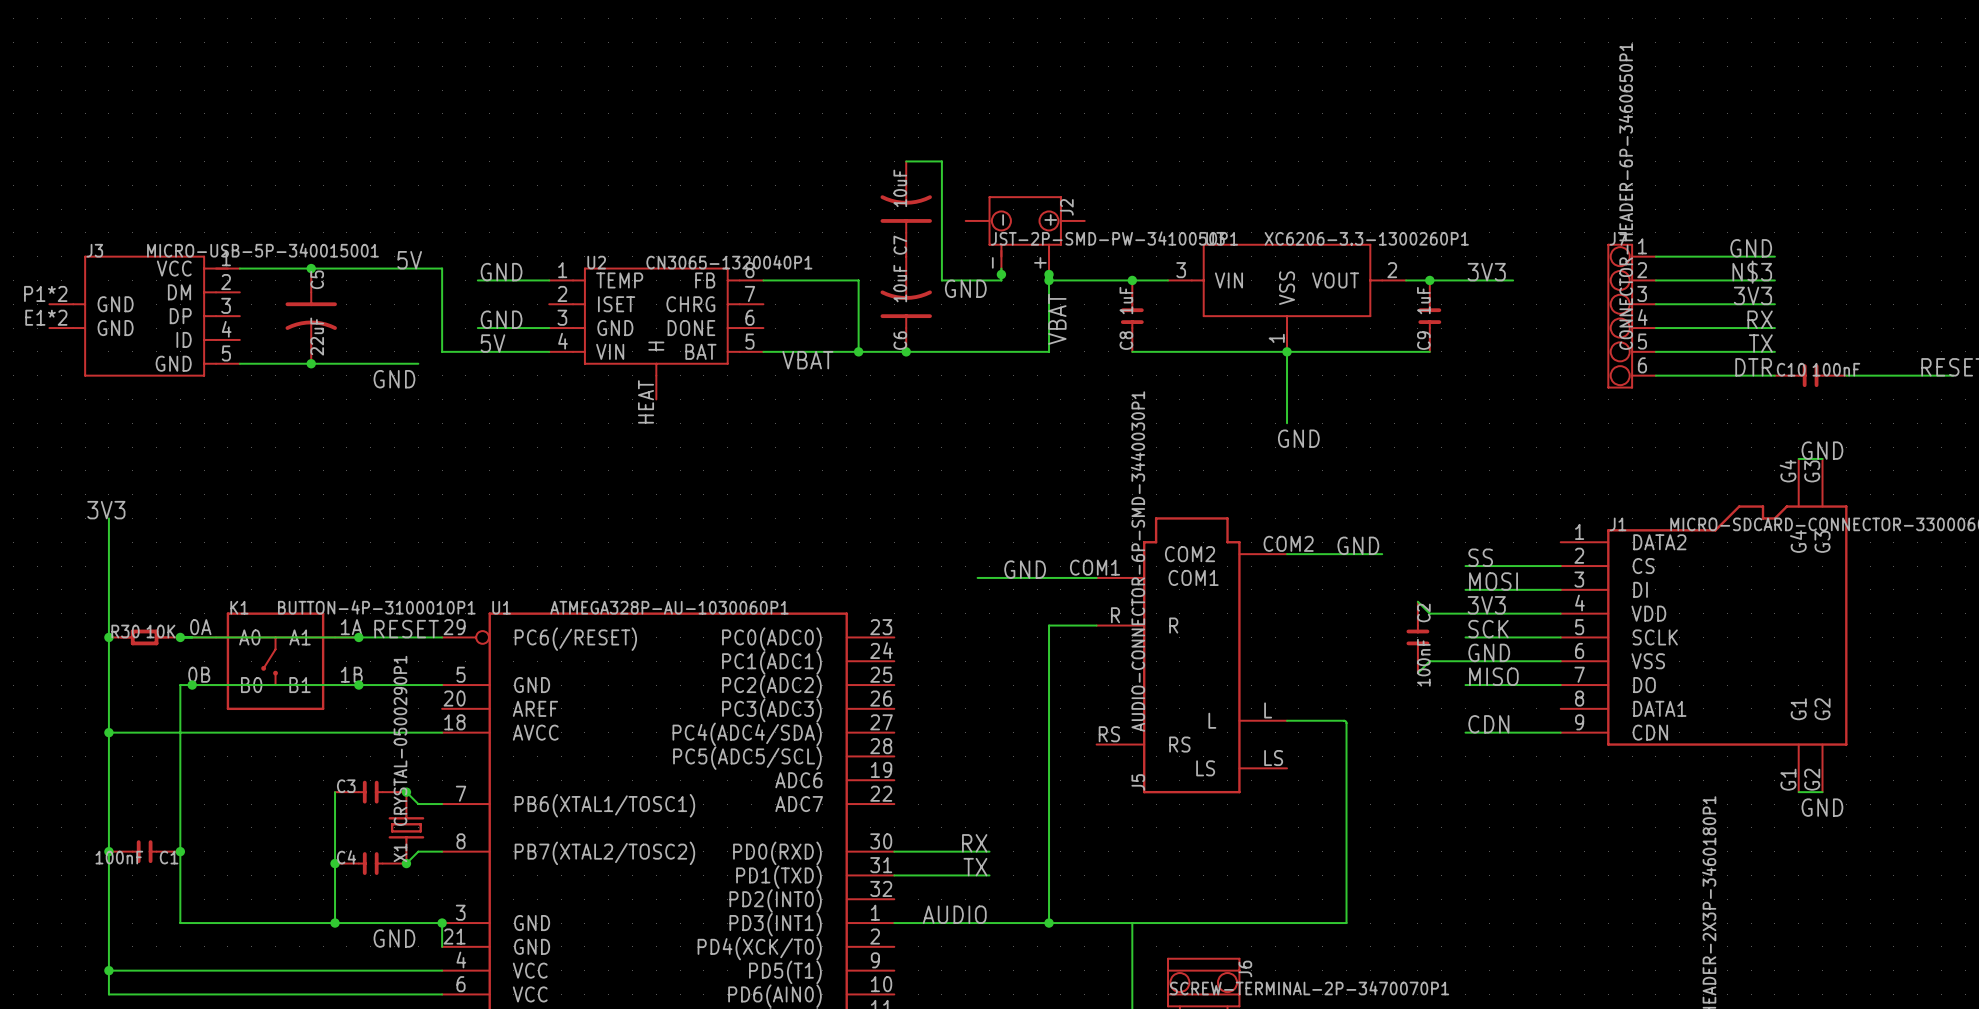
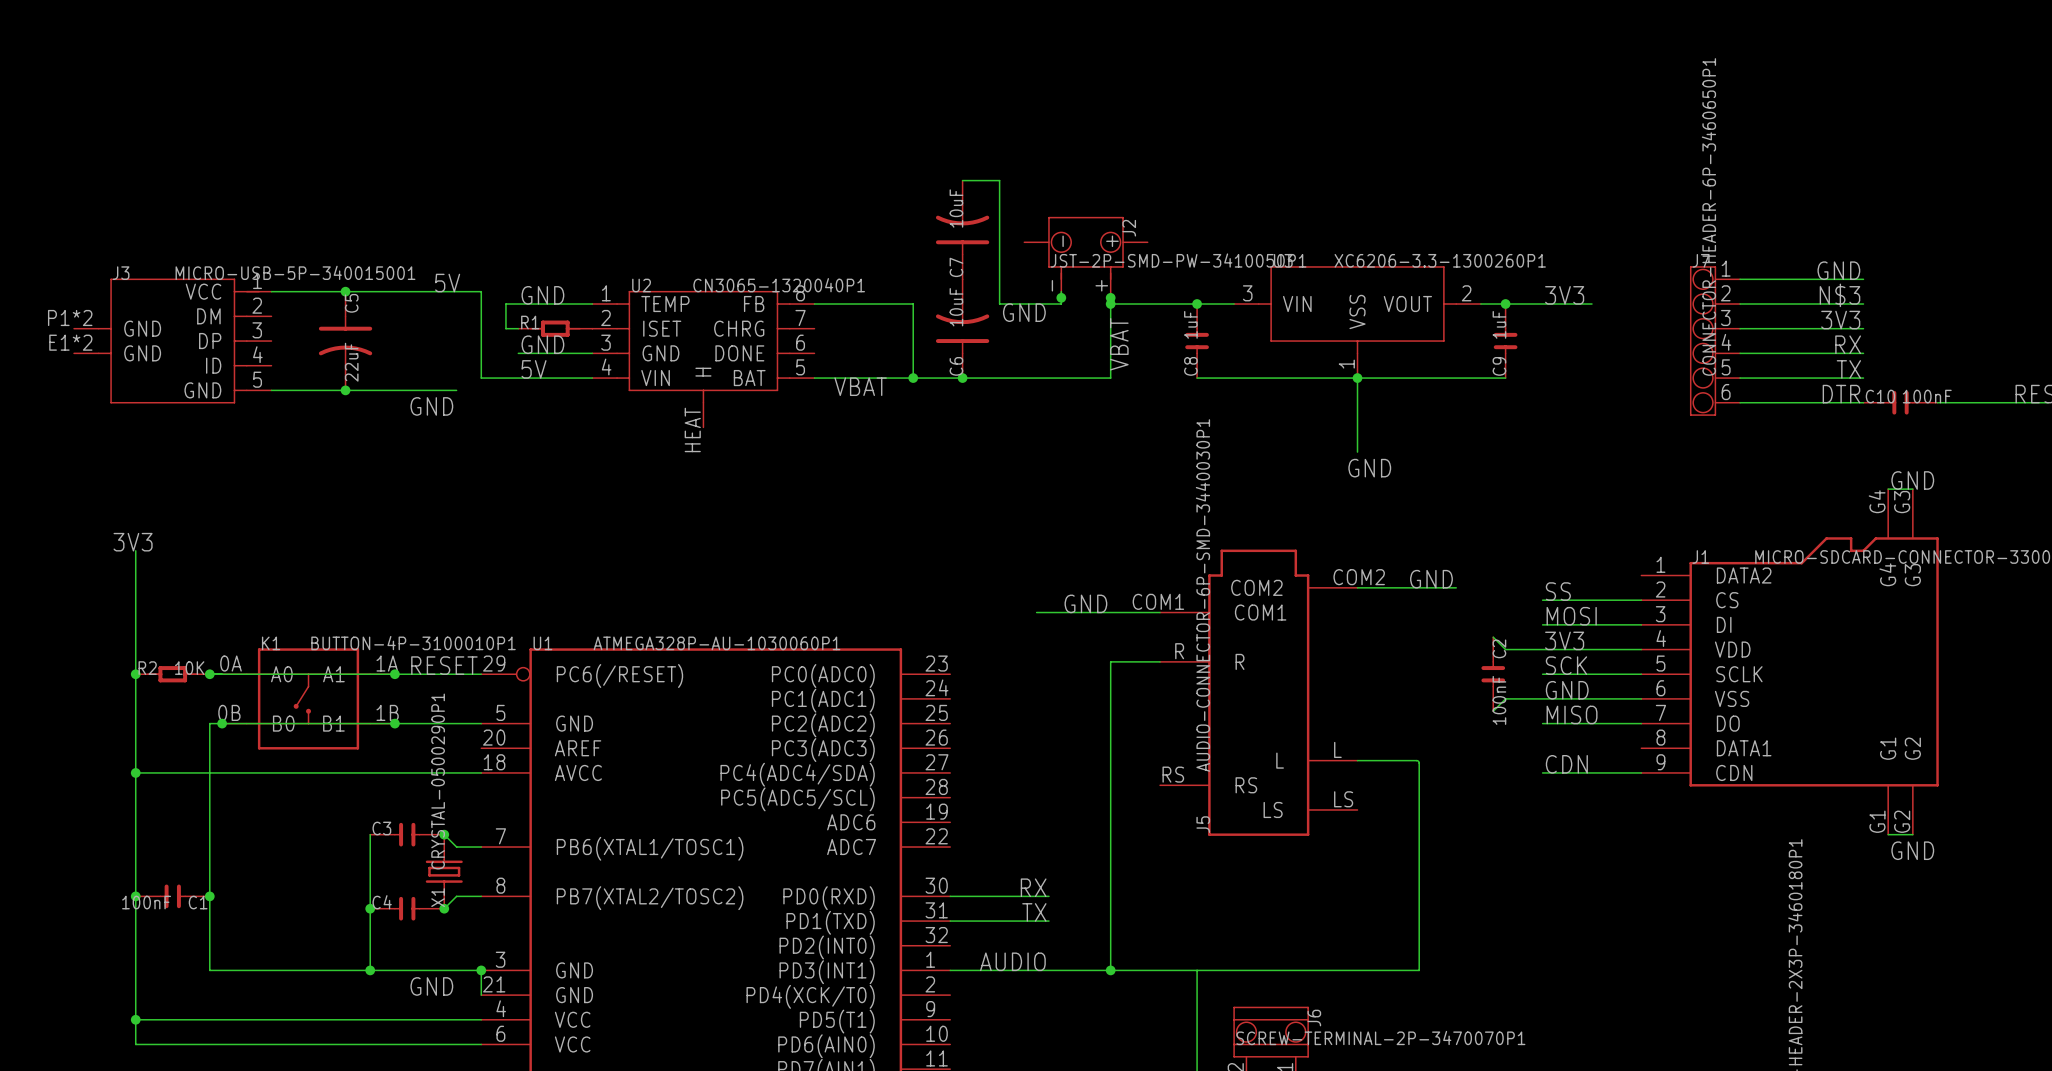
wire: none -> (518, 304) (505, 304) (505, 328) (518, 328)
R1: none -> (555, 328)
R30 name: R30 (125, 631) -> R2 (147, 668)

